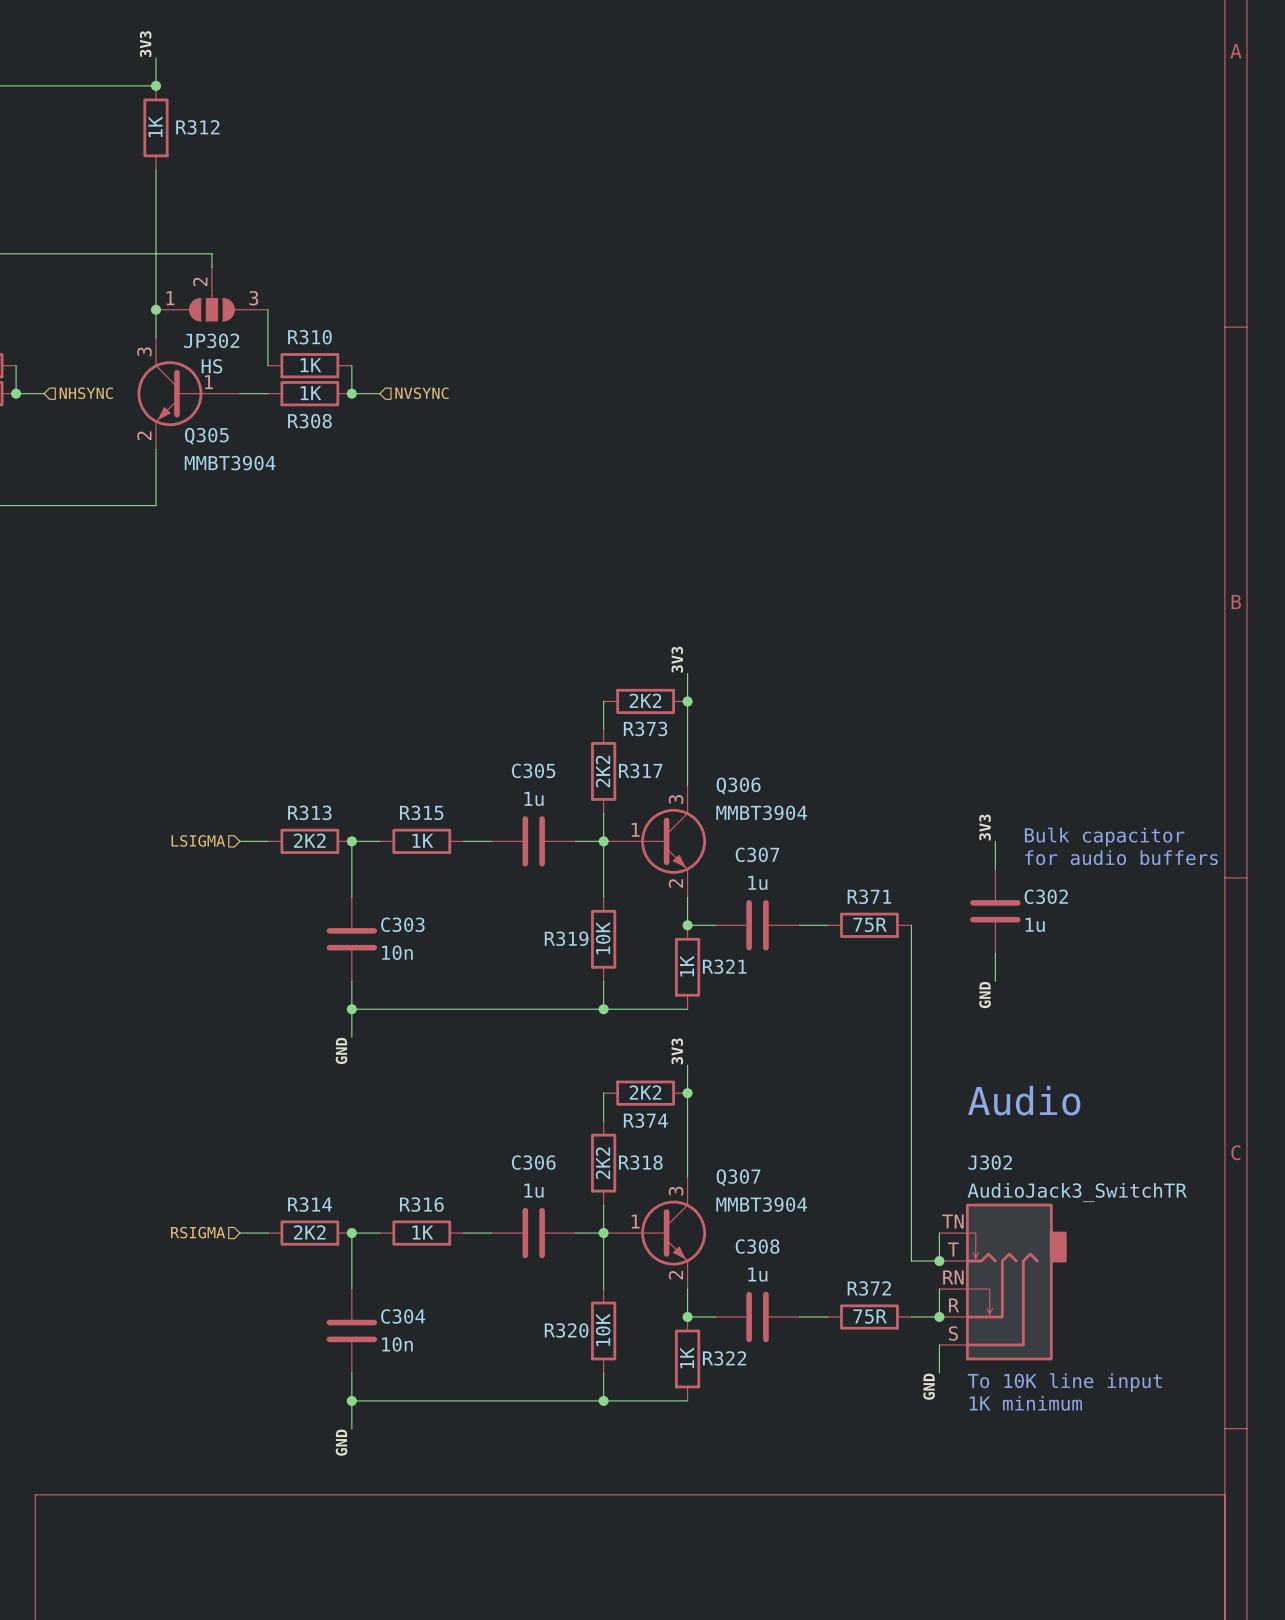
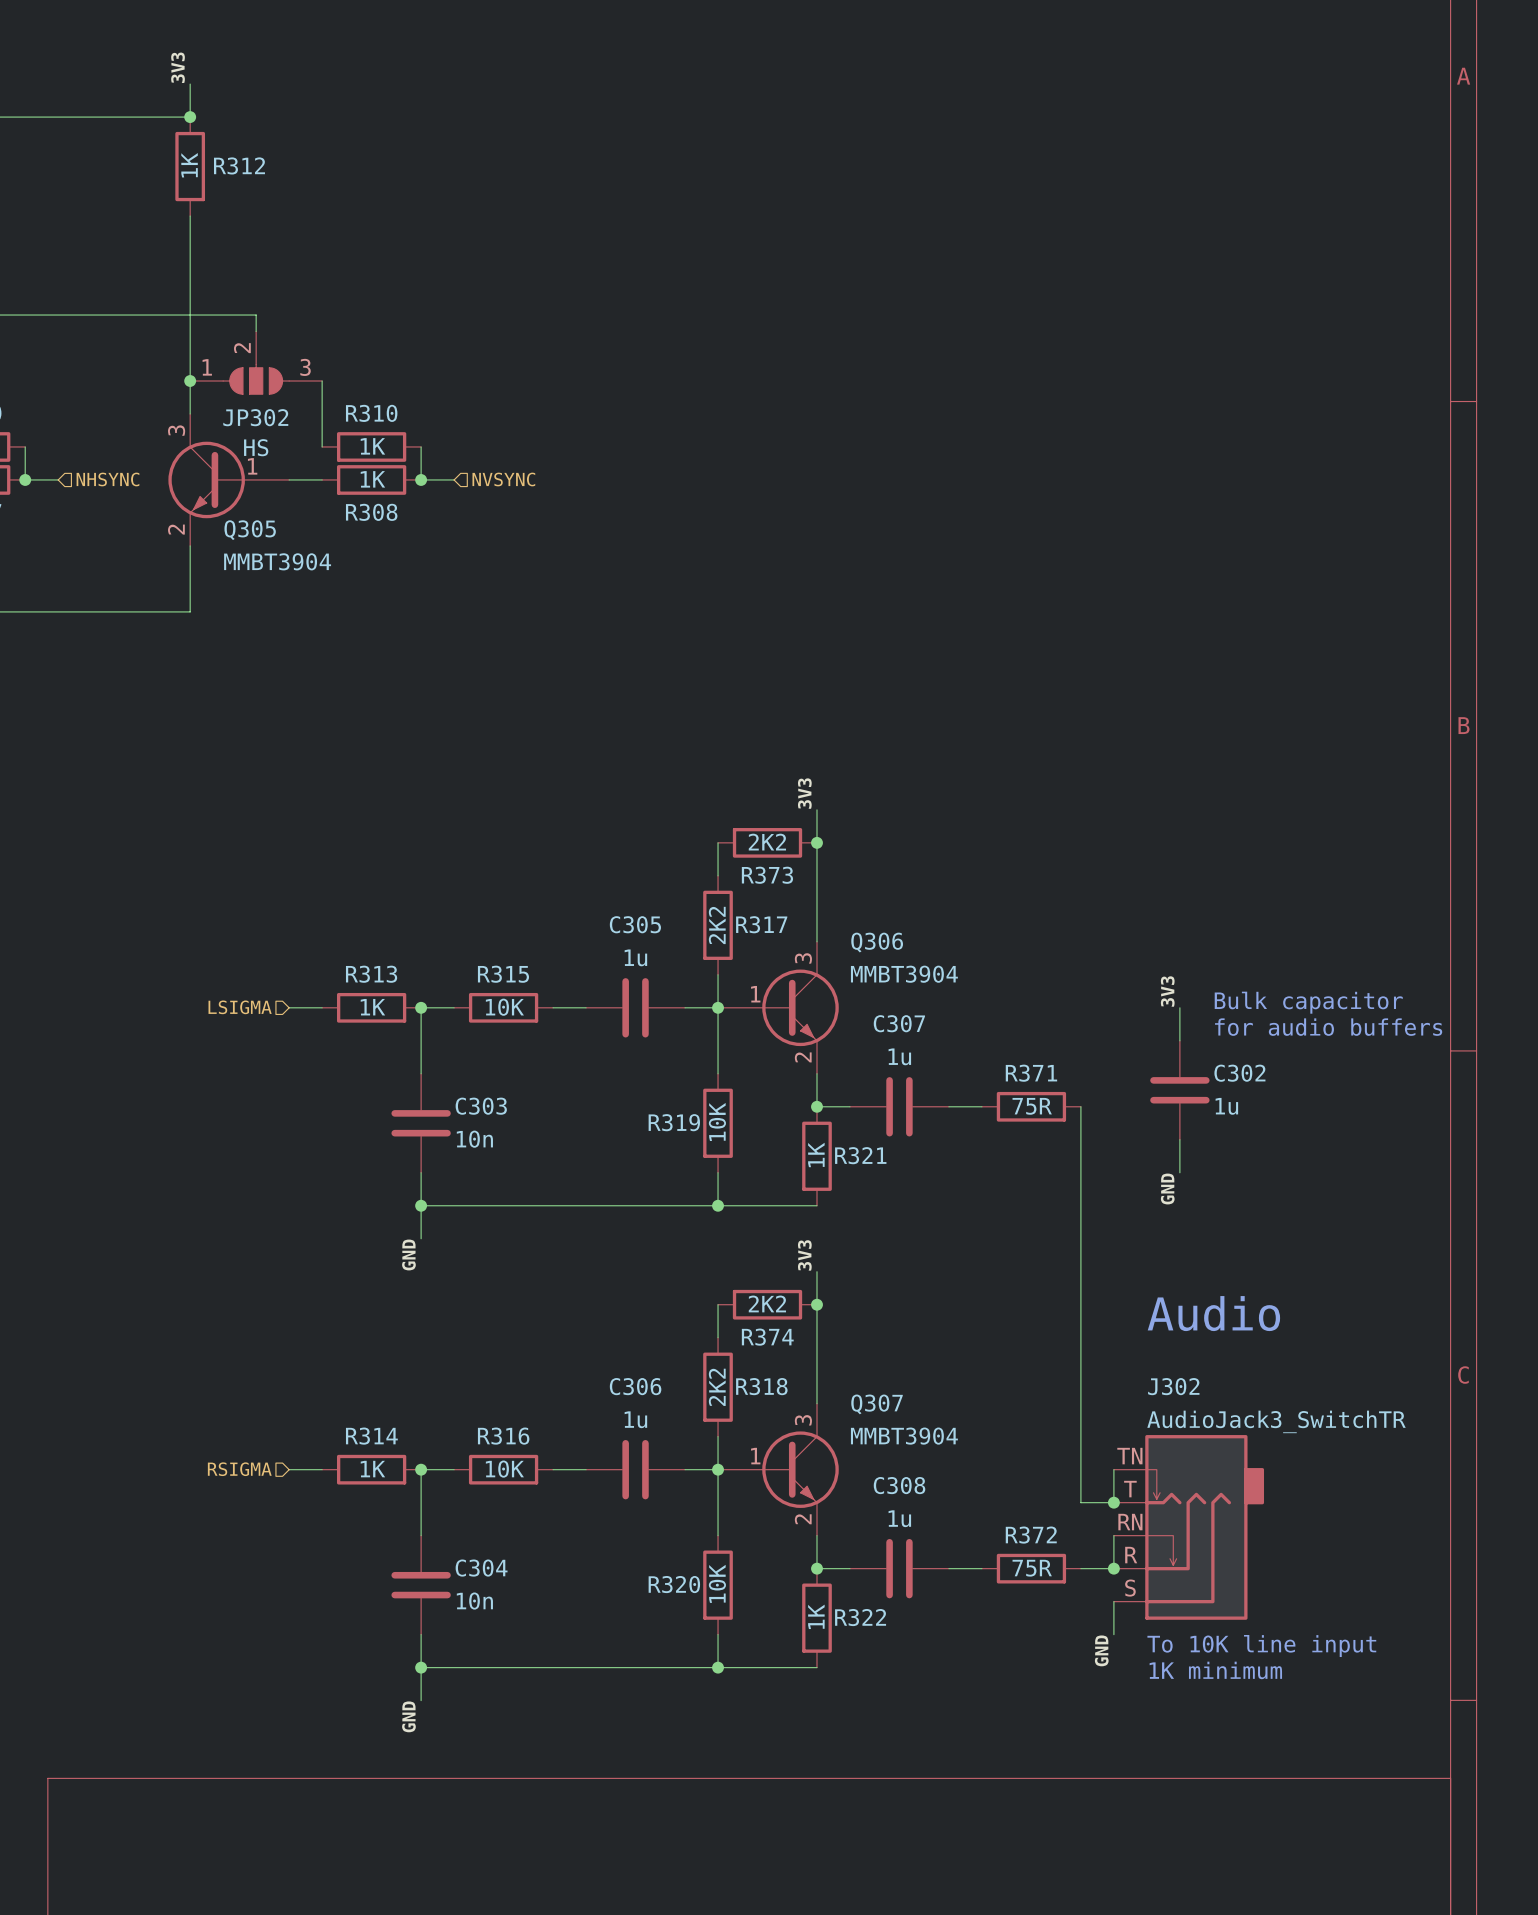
R313 value: 2K2 (309, 840) -> 1K (372, 1007)
R315 value: 1K (422, 840) -> 10K (504, 1007)
R314 value: 2K2 (309, 1232) -> 1K (372, 1469)
R316 value: 1K (422, 1232) -> 10K (504, 1469)

